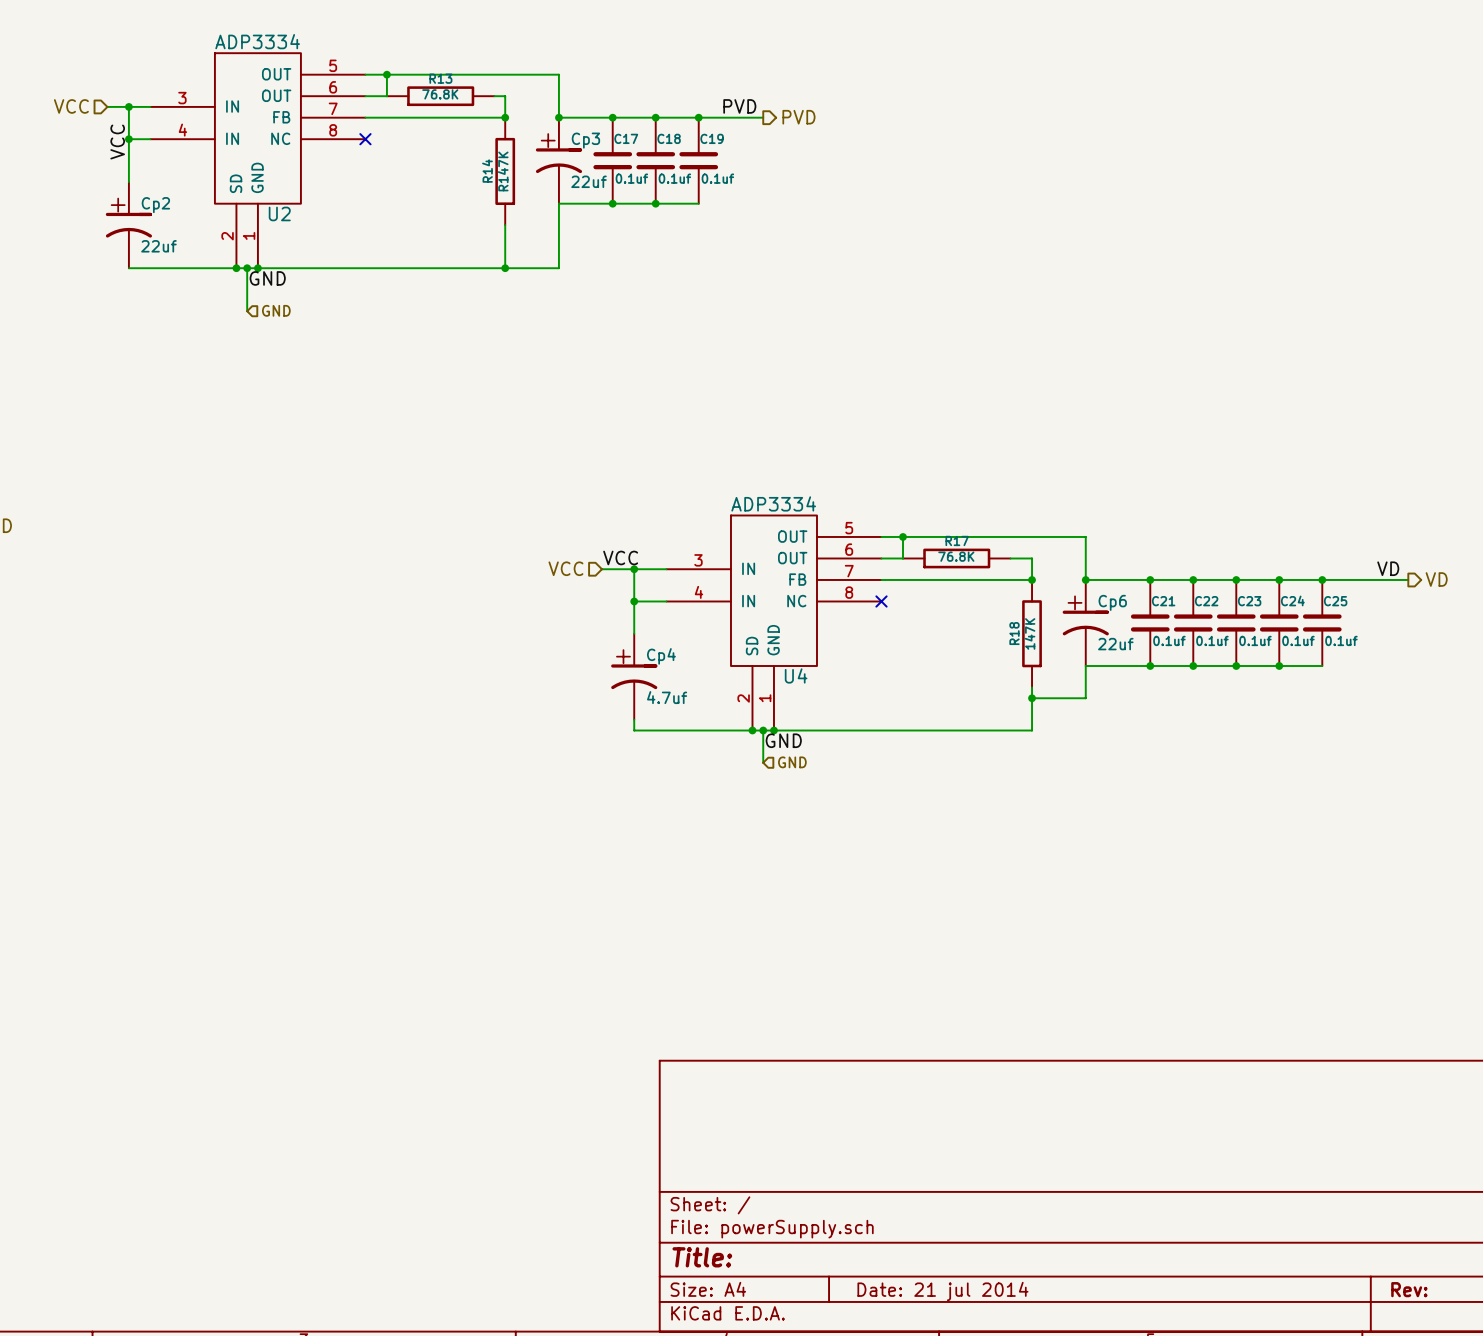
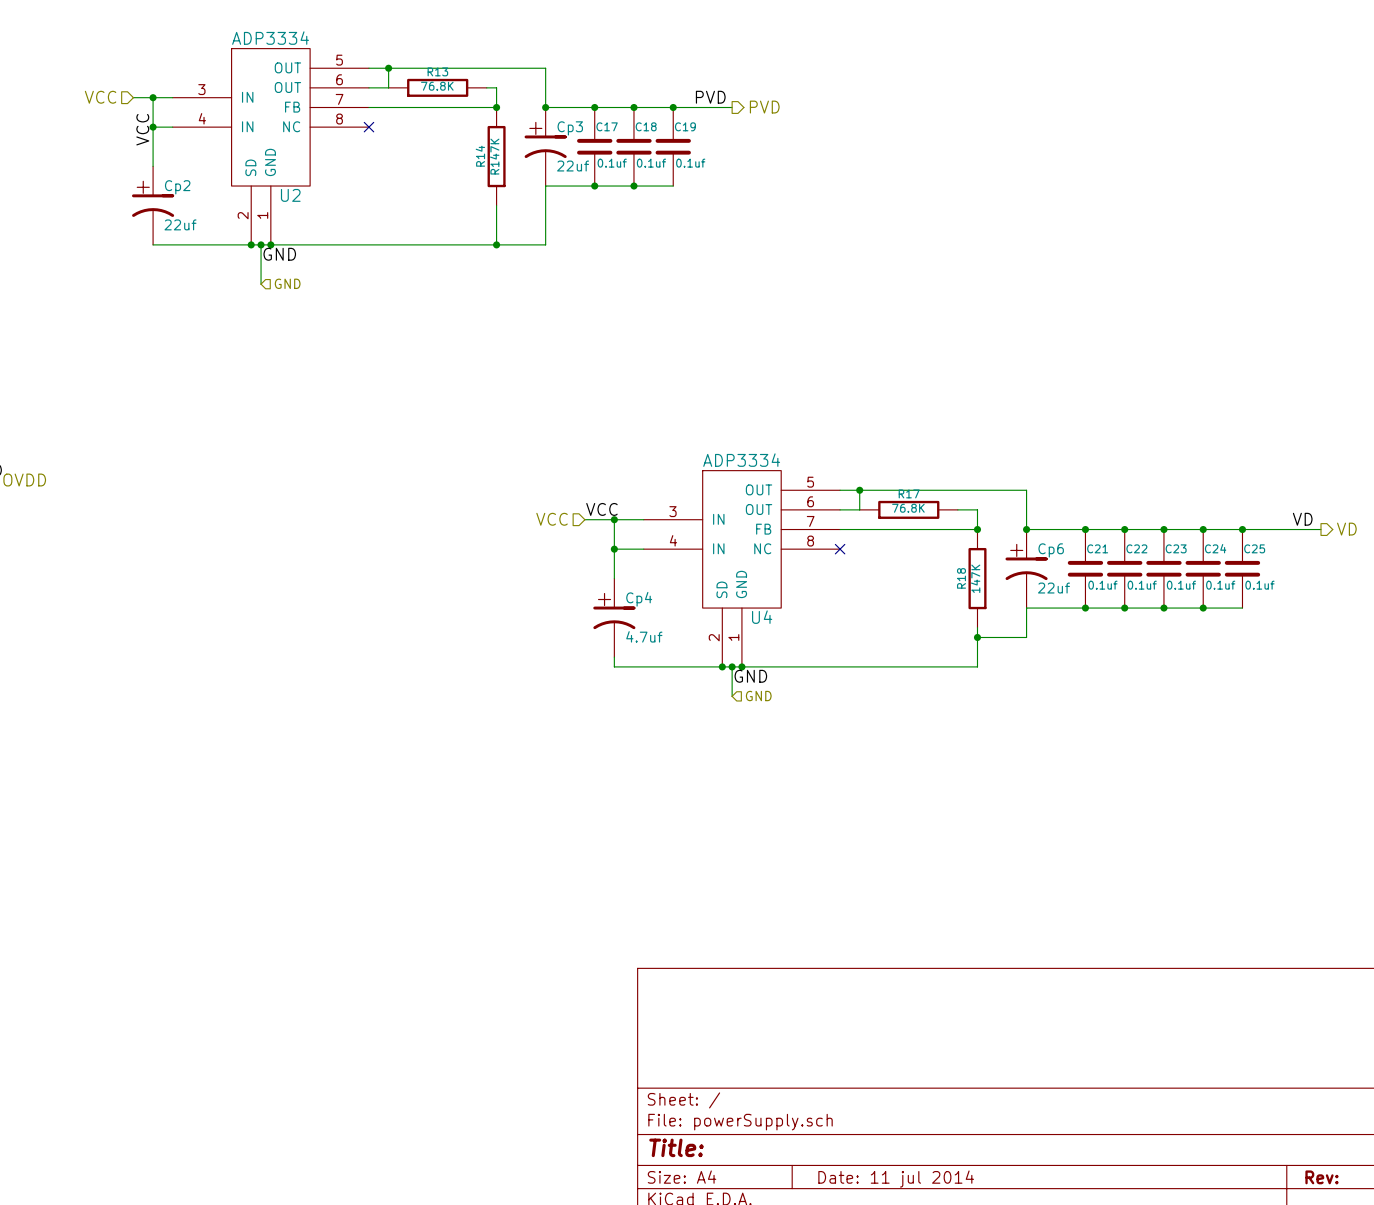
title block: Date: 21 jul 2014 (942, 1291) -> Date: 11 jul 2014 (896, 1179)

